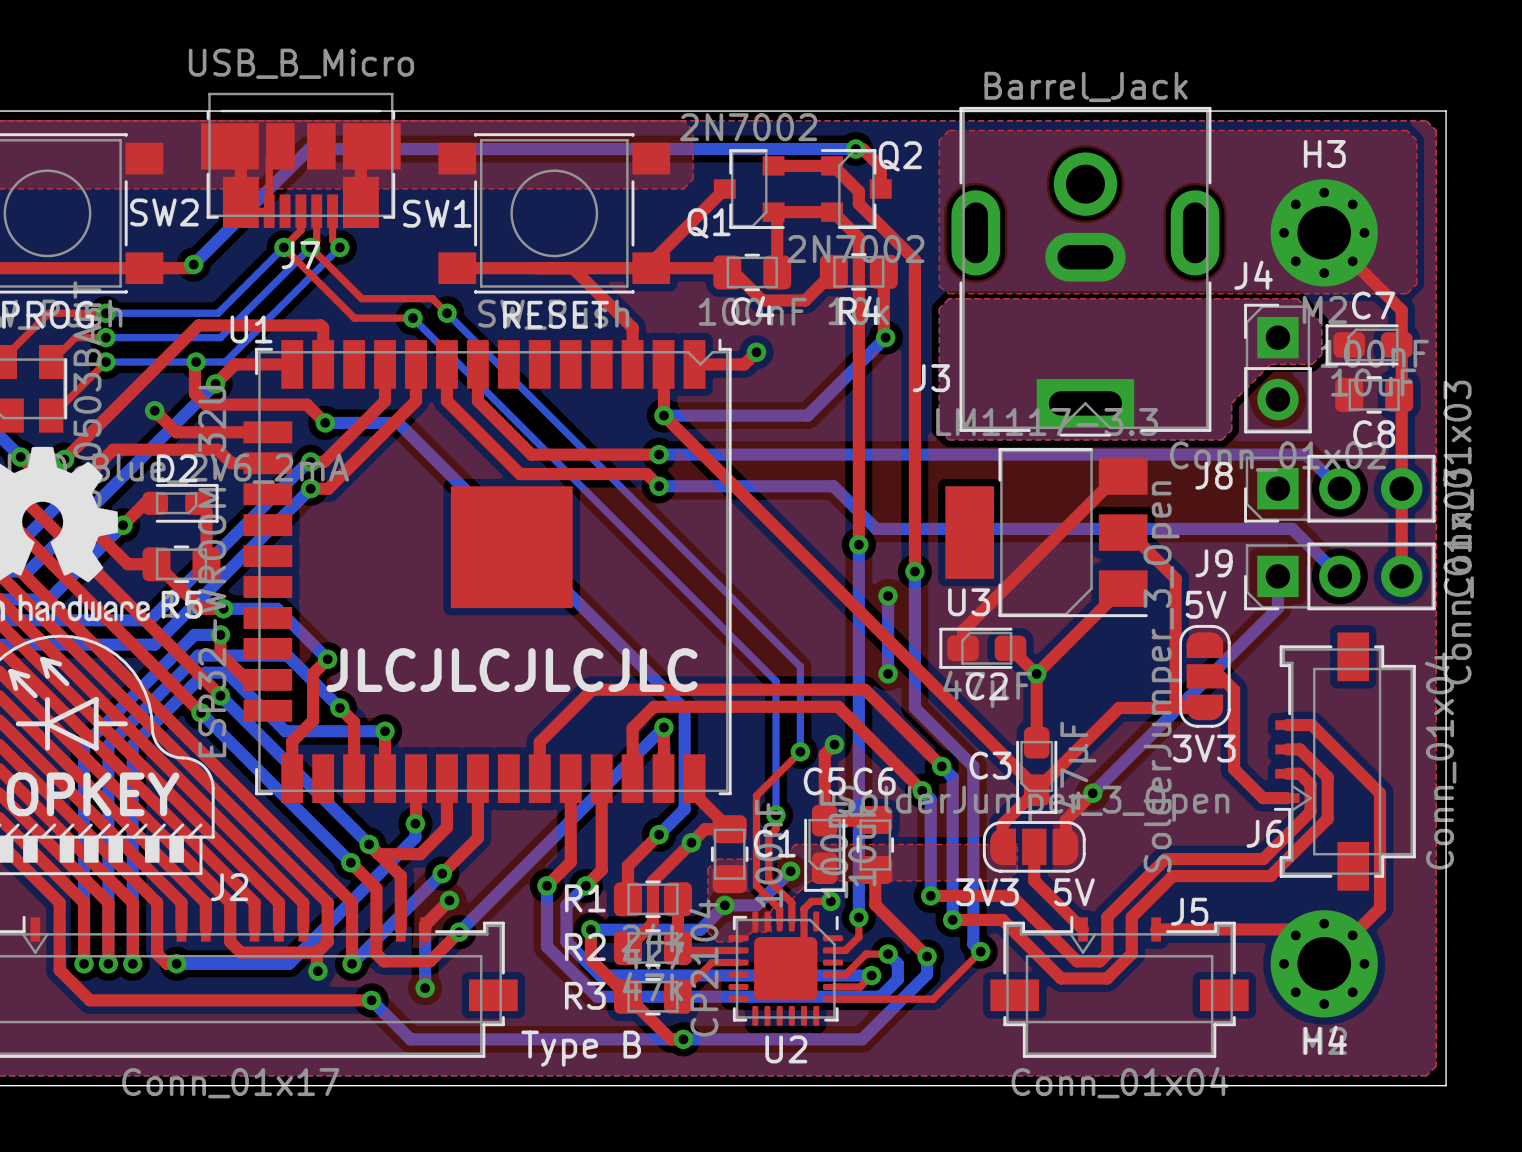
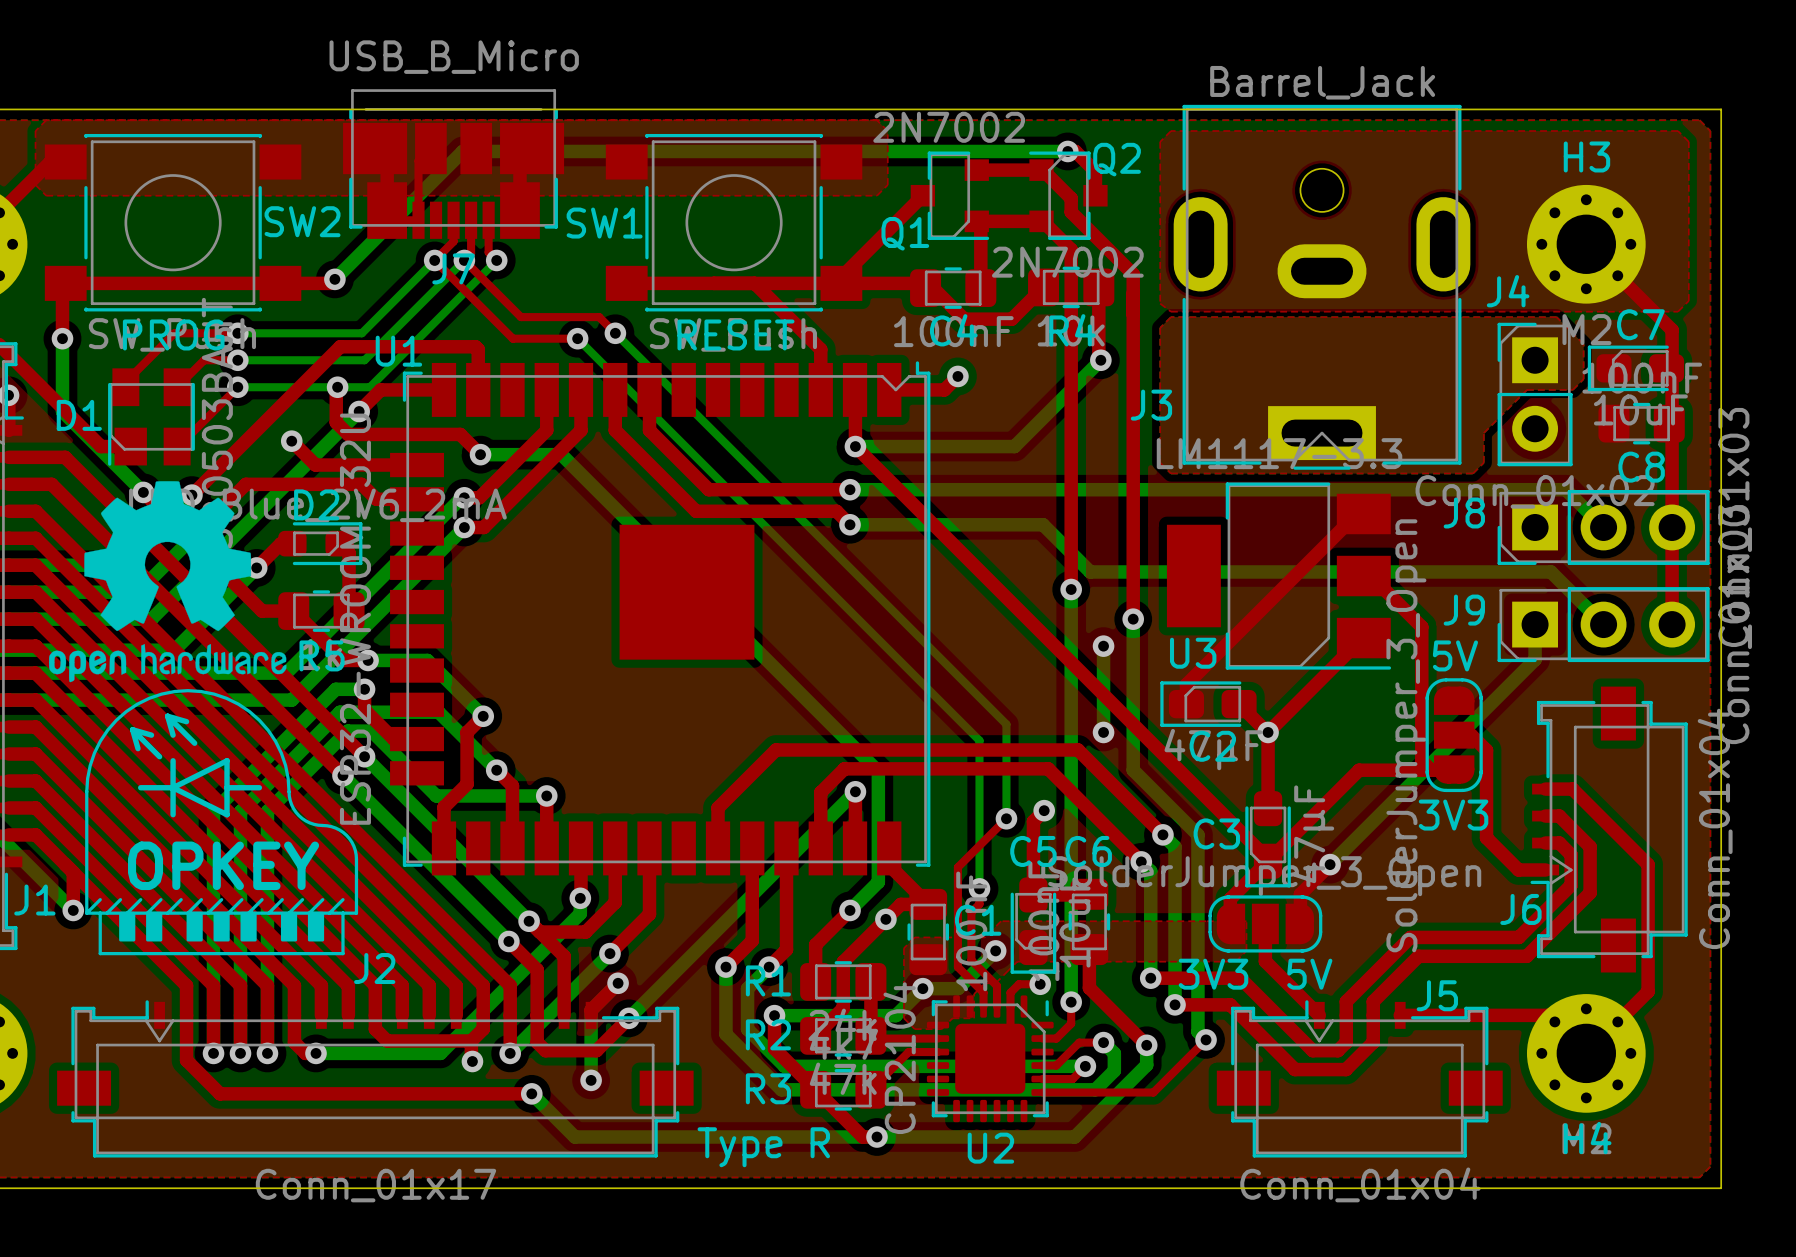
J3 footprint: [951, 106, 1220, 437] -> [1173, 104, 1471, 470]
text: JLCJLCJLCJLC (511, 670) -> none
text: Type B (581, 1048) -> Type R (763, 1147)

